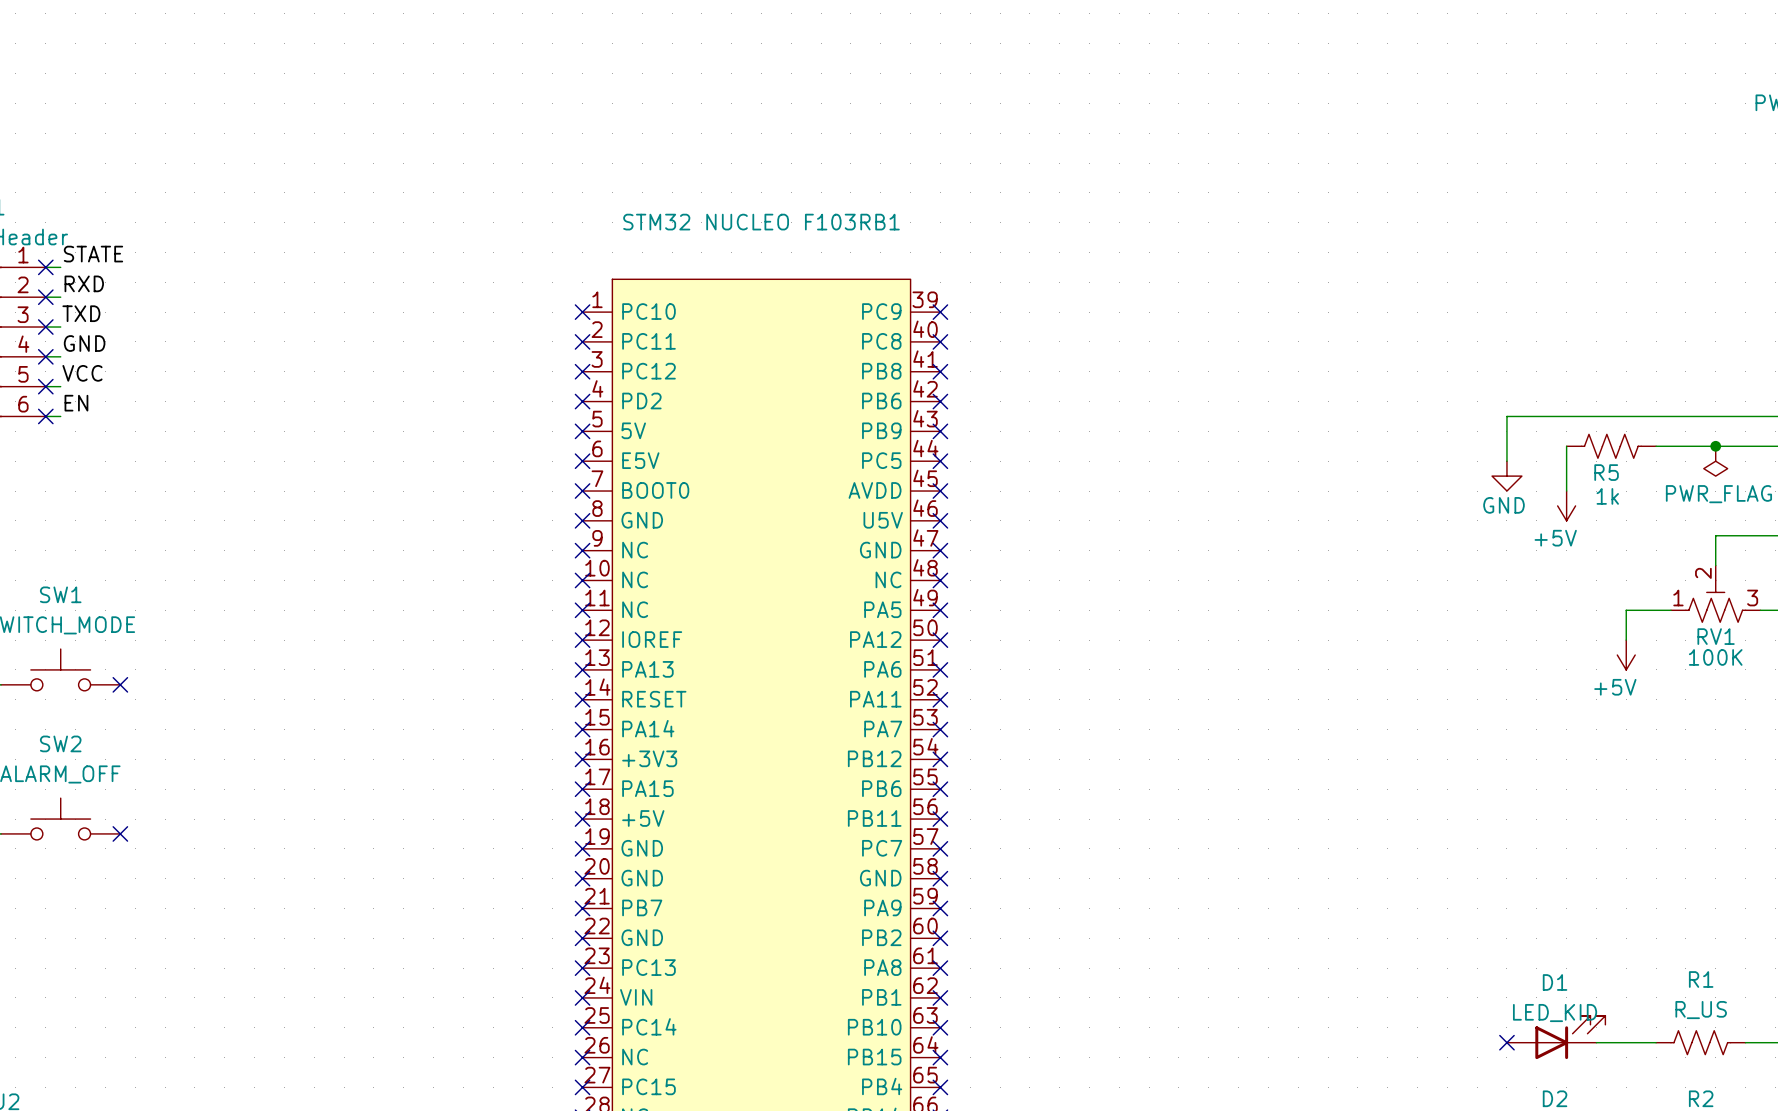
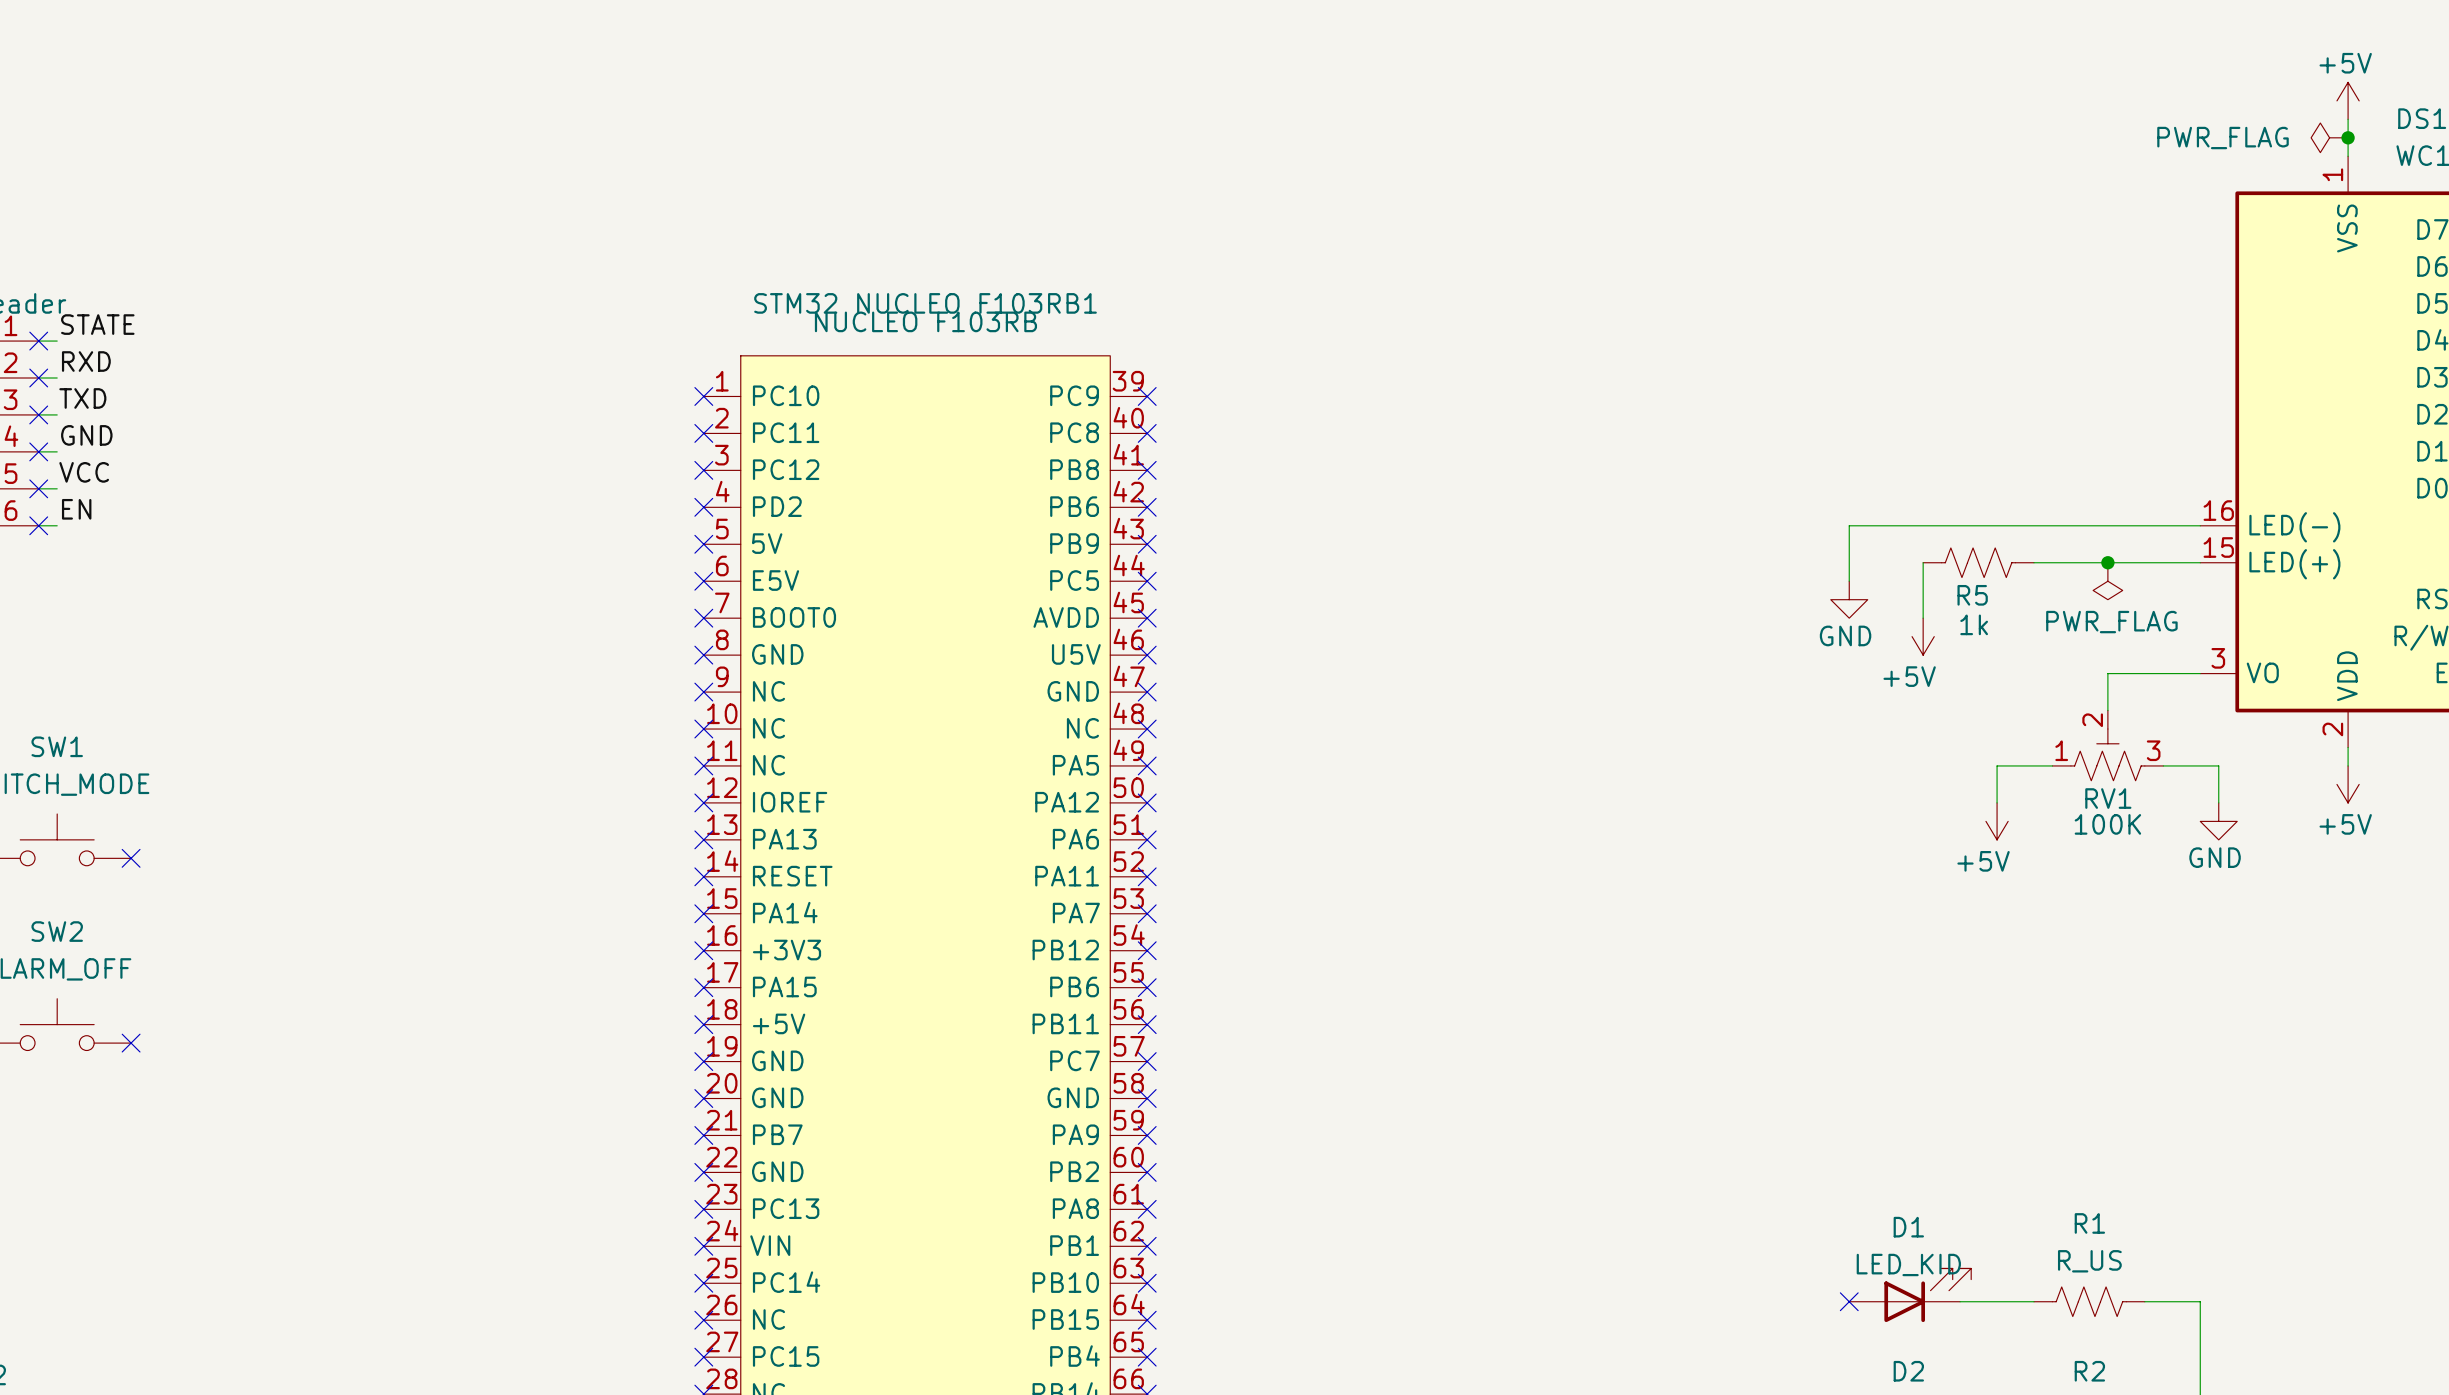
STM32 NUCLEO F103RB1 name position: STM32 NUCLEO F103RB1 (761, 222) -> STM32 NUCLEO F103RB1 (925, 303)
STM32 NUCLEO F103RB1 value: none -> NUCLEO F103RB (925, 321)

